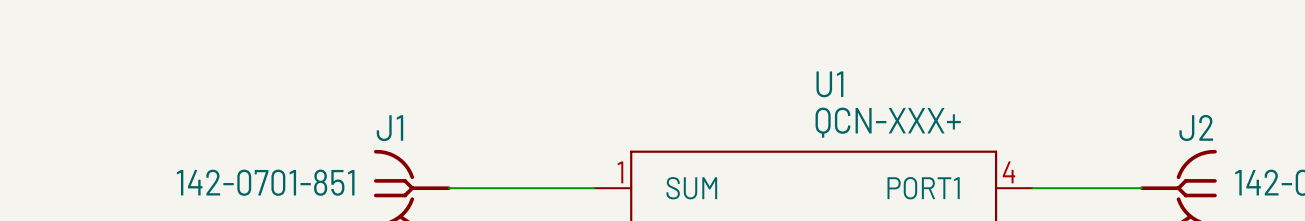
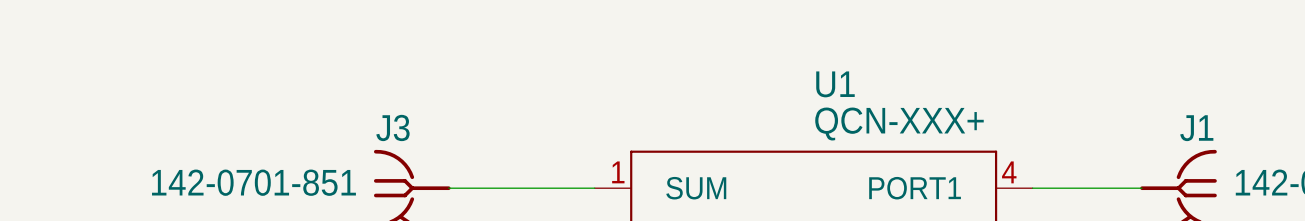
J2 name: J2 (1196, 127) -> J1 (1196, 128)
J1 name: J1 (389, 128) -> J3 (392, 127)

